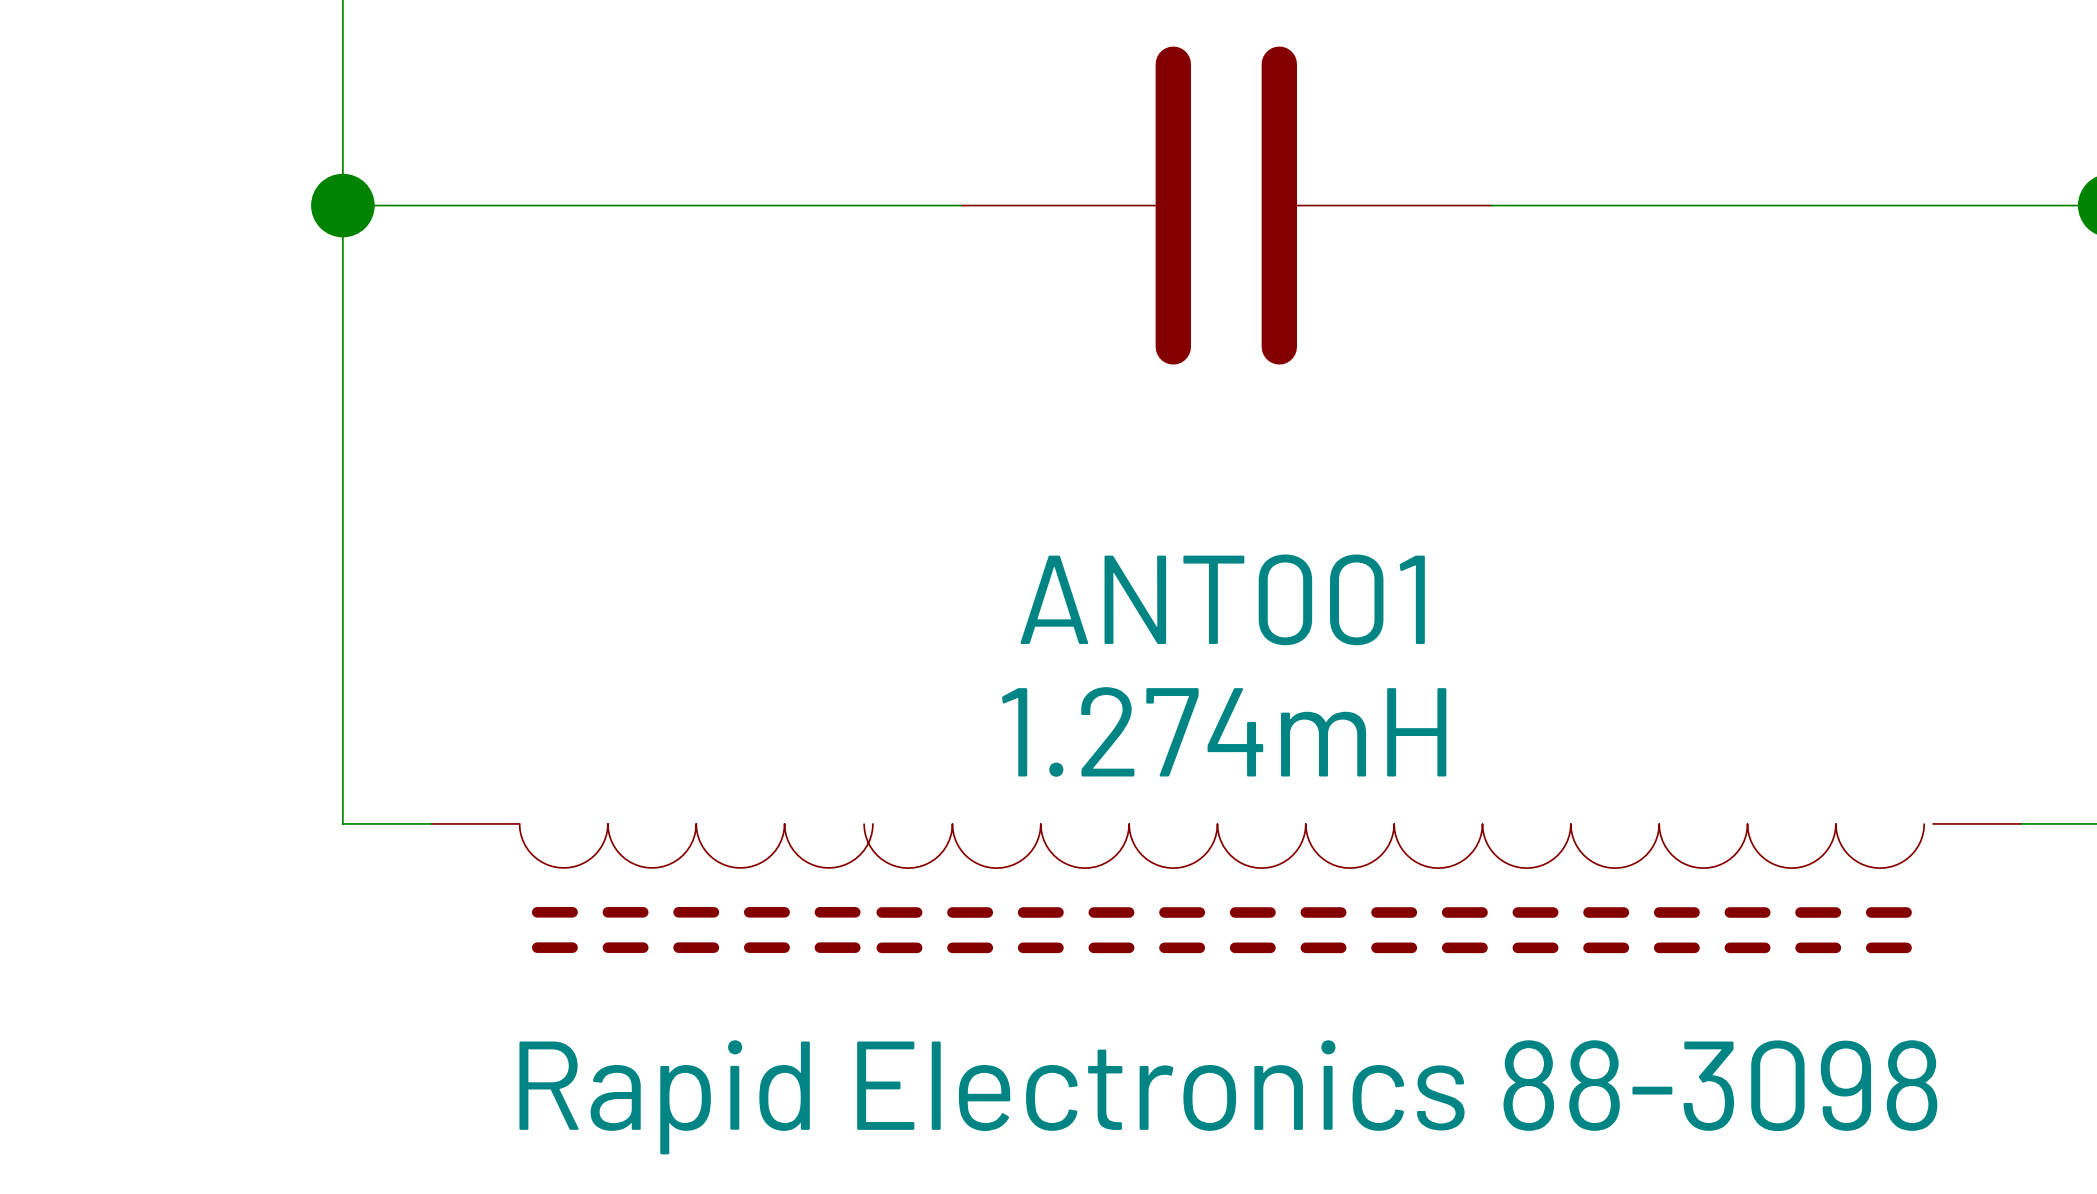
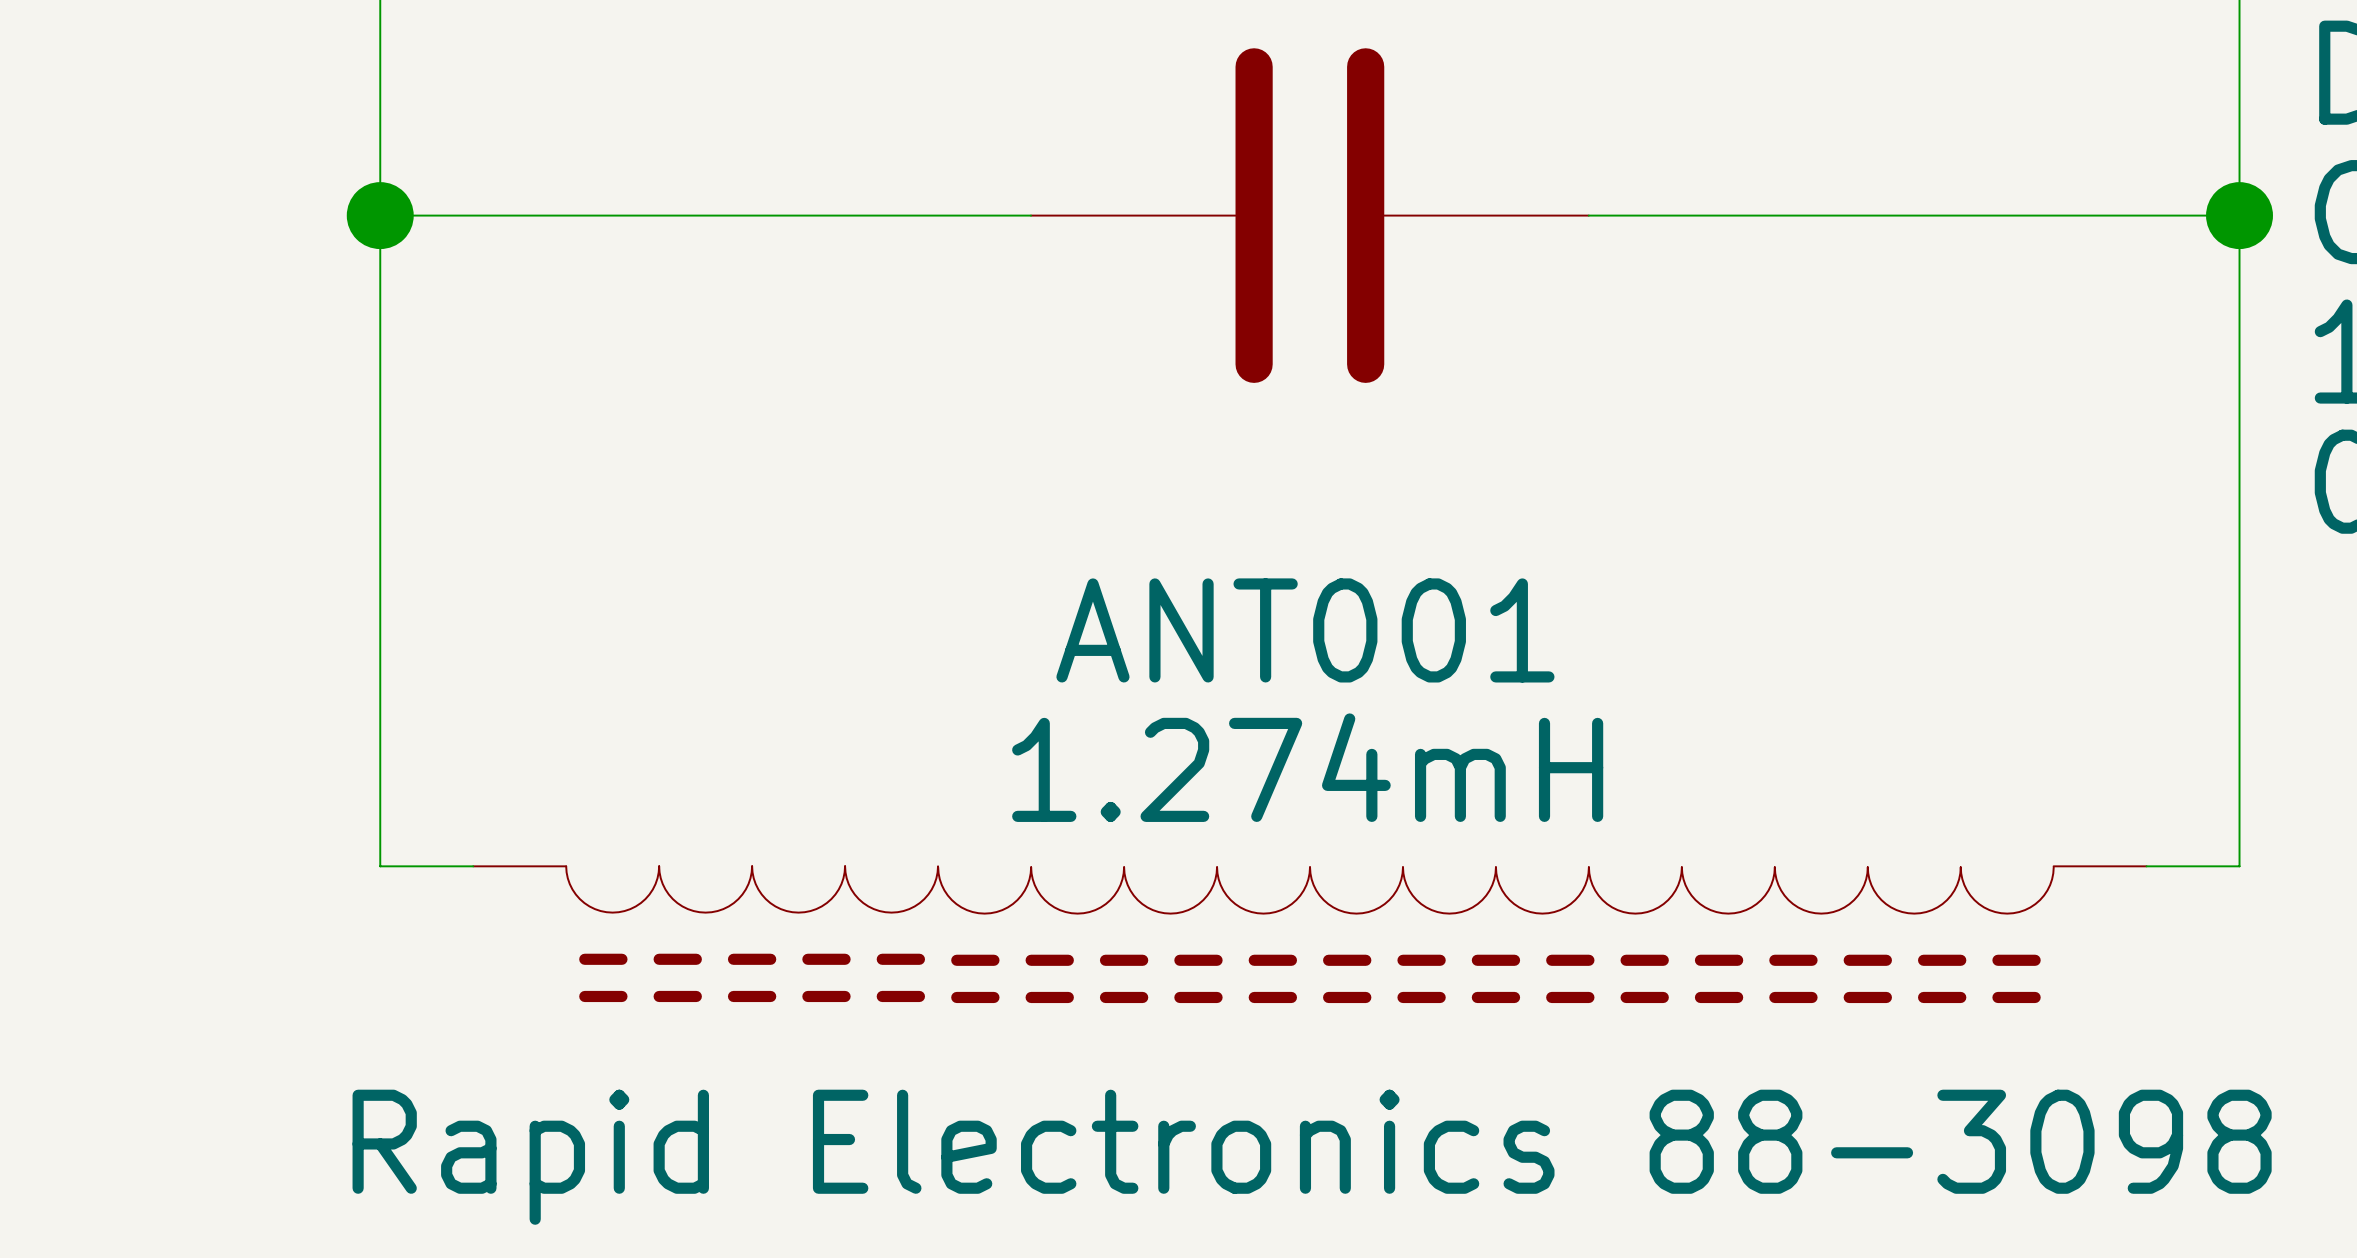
ANT001 symbol: [431, 823, 2022, 954] -> [473, 866, 2147, 1004]

